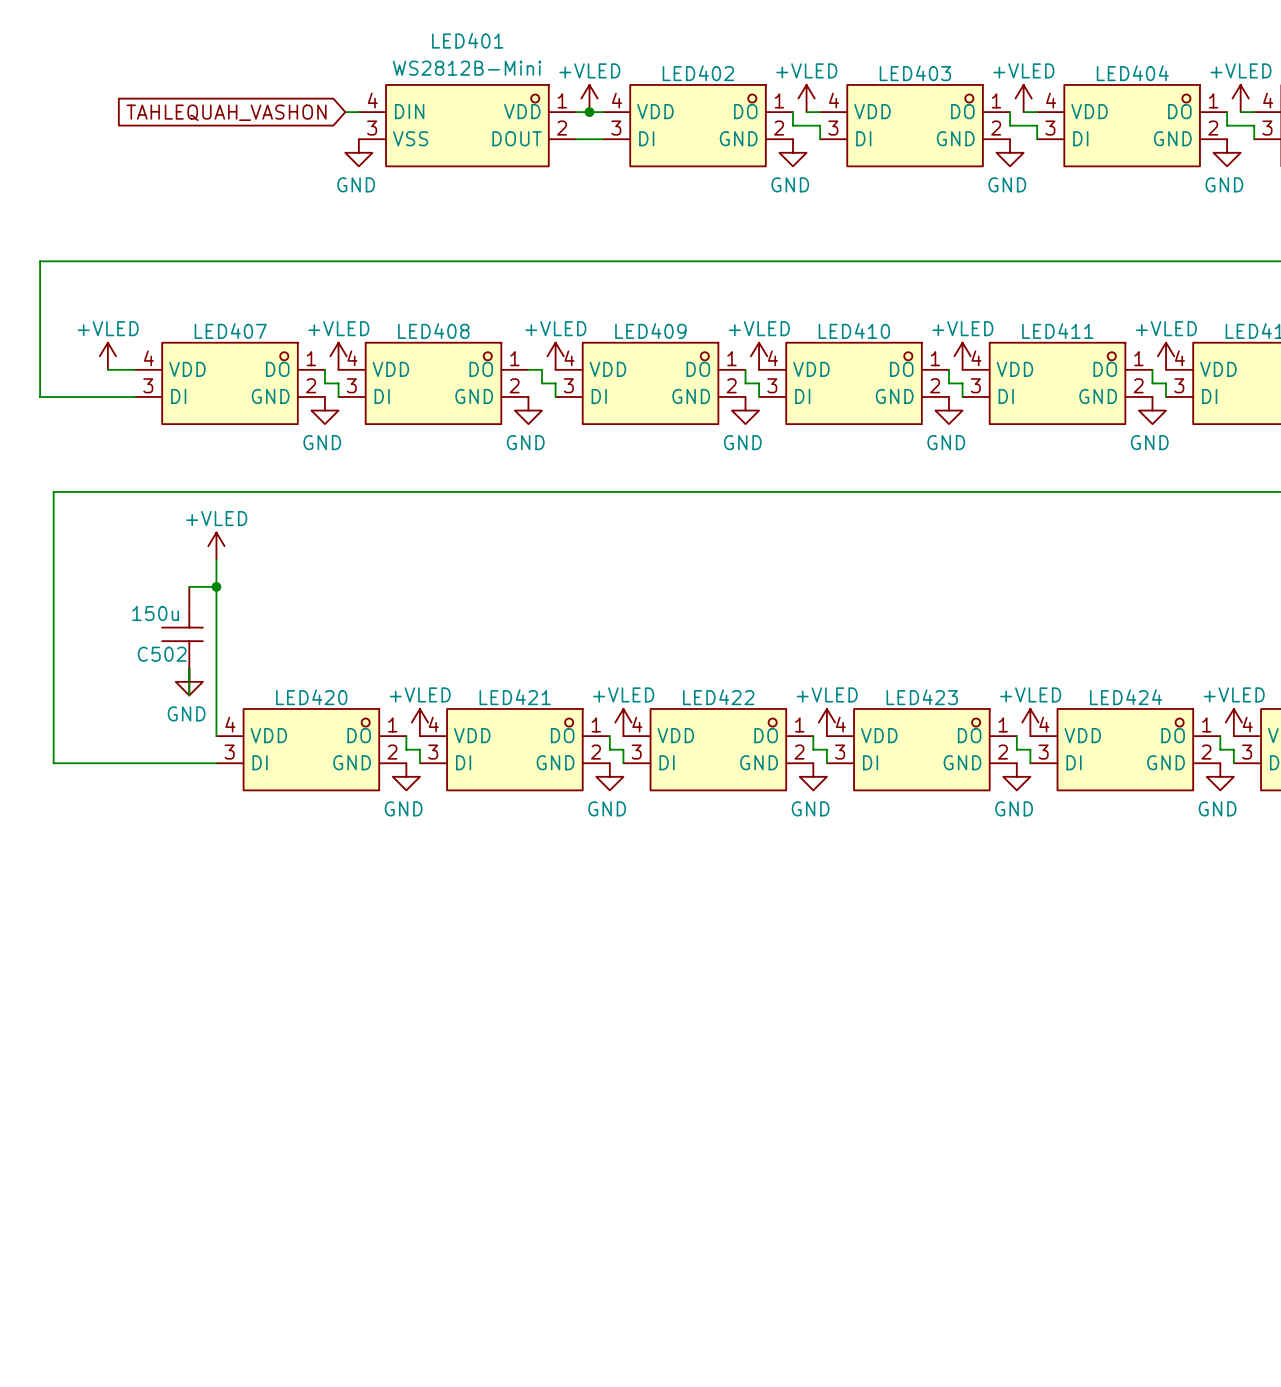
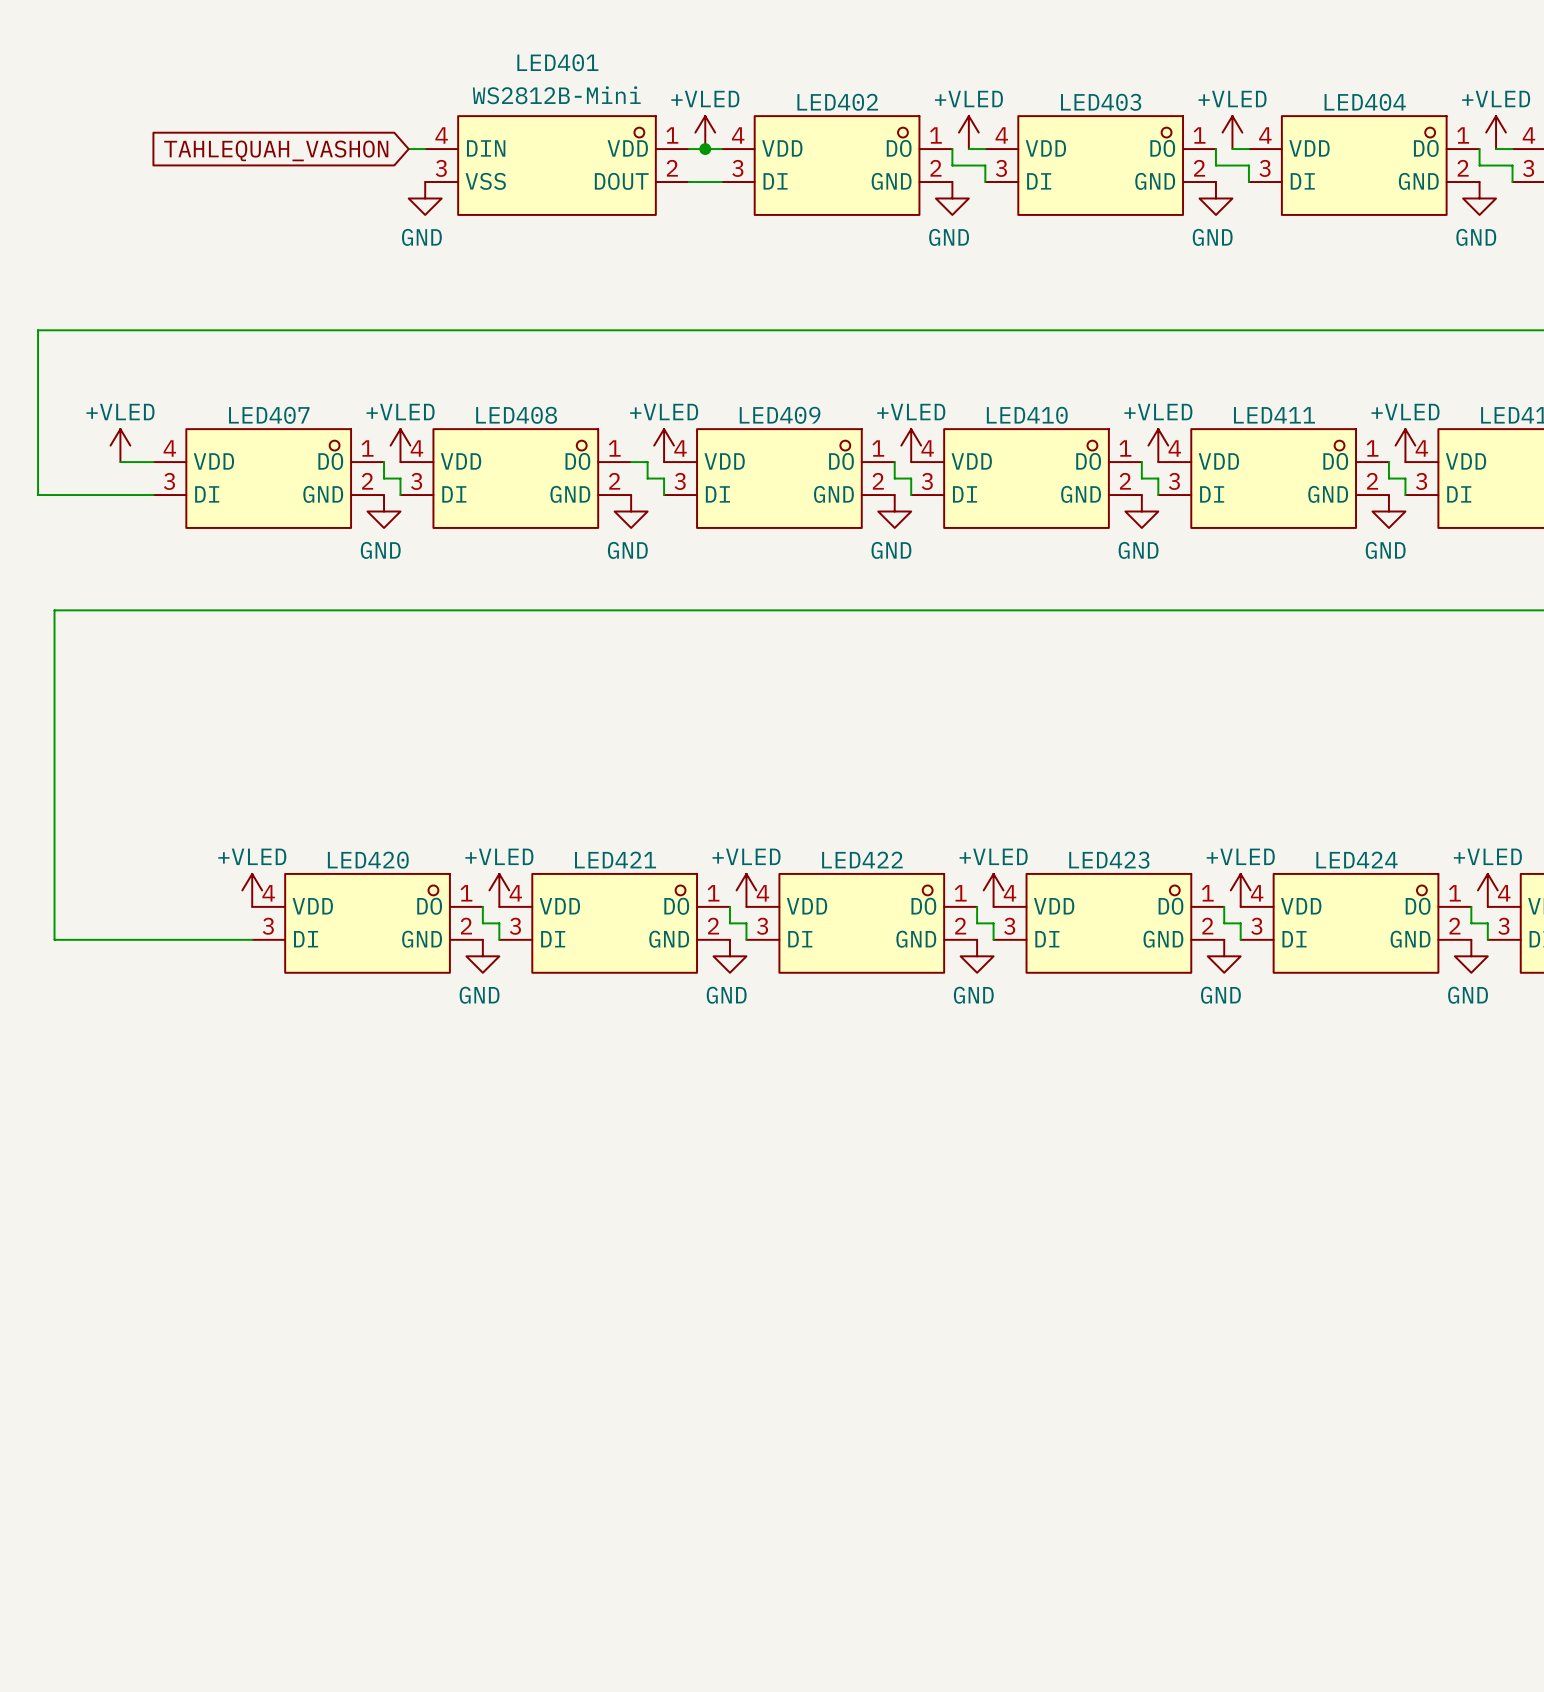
power symbol position: +VLED (216, 546) -> +VLED (252, 890)
wire: (216, 559) (216, 736) -> none
wire: (189, 586) (216, 586) -> none
junction: (216, 586) -> none
C502: 150u (182, 641) -> none
wire: (189, 668) (189, 695) -> none
power symbol: GND (189, 681) -> none

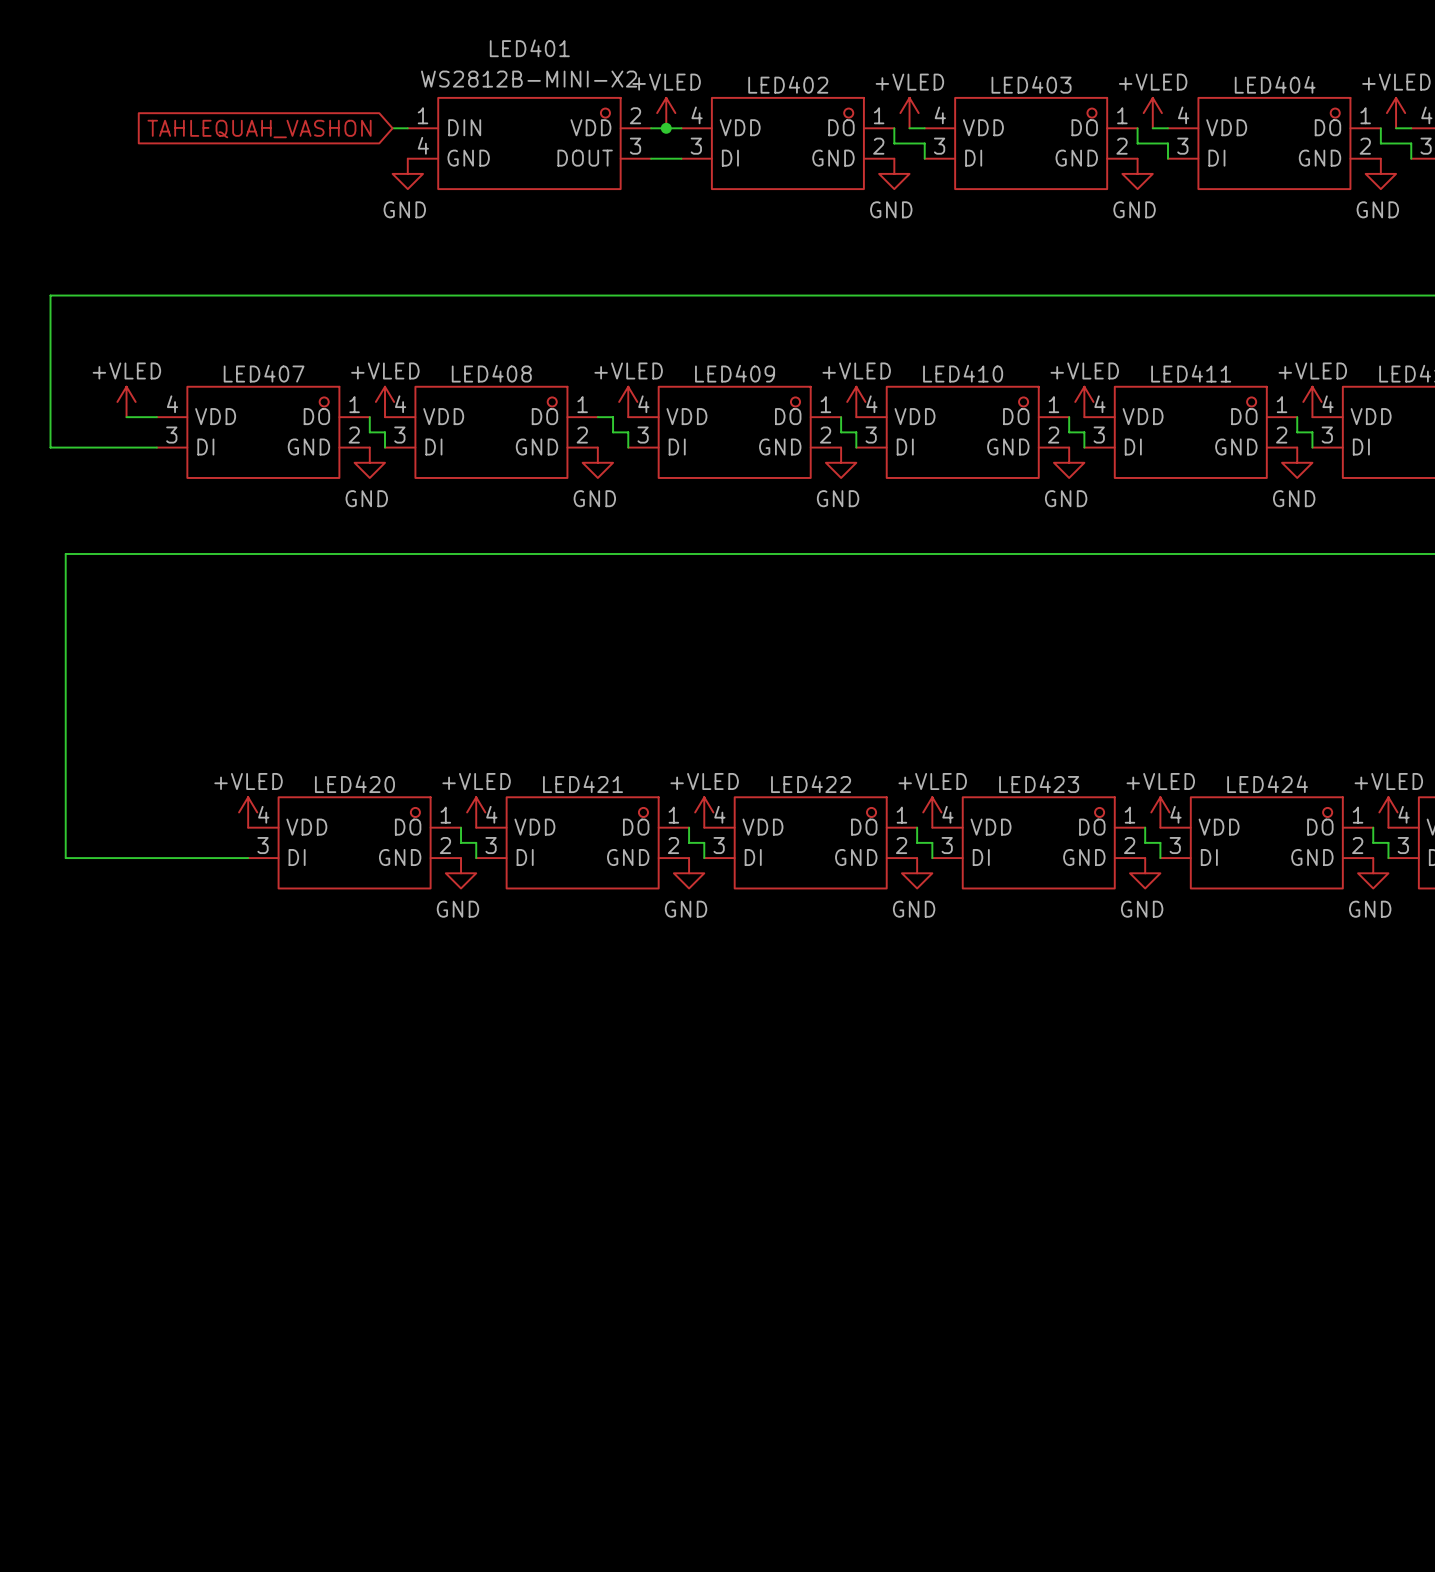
LED401 value: WS2812B-Mini (556, 95) -> WS2812B-MINI-X2 (529, 79)
LED401 pin number: 4 (441, 135) -> 1 (423, 115)
LED401 pin number: 1 (672, 135) -> 2 (635, 115)
LED401 pin number: 3 (441, 168) -> 4 (423, 145)
LED401 pin number: 2 (672, 168) -> 3 (635, 146)
LED401 pin name: VSS (485, 181) -> GND (468, 158)

